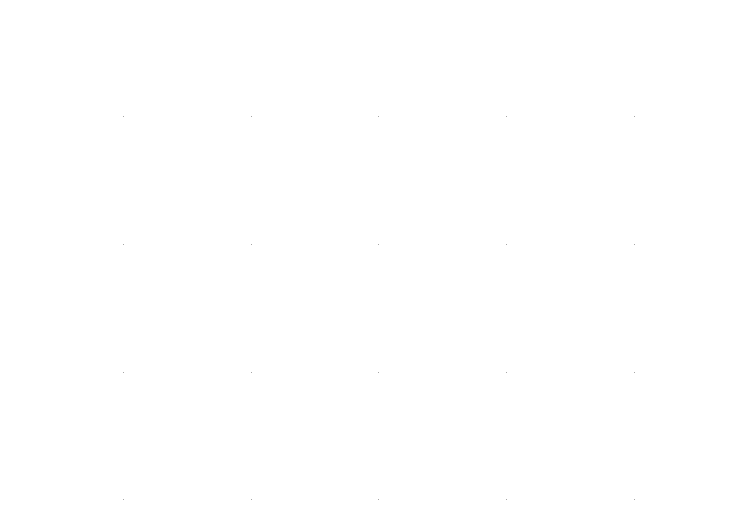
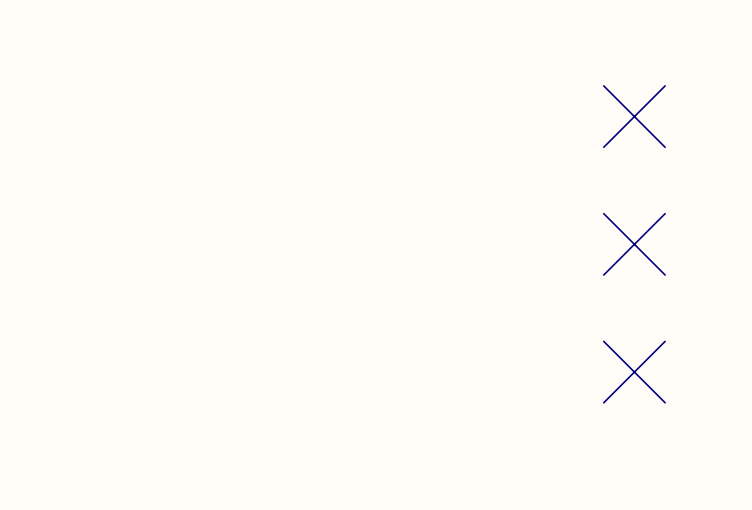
no-connect mark: none -> (634, 116)
no-connect mark: none -> (634, 244)
no-connect mark: none -> (634, 372)

